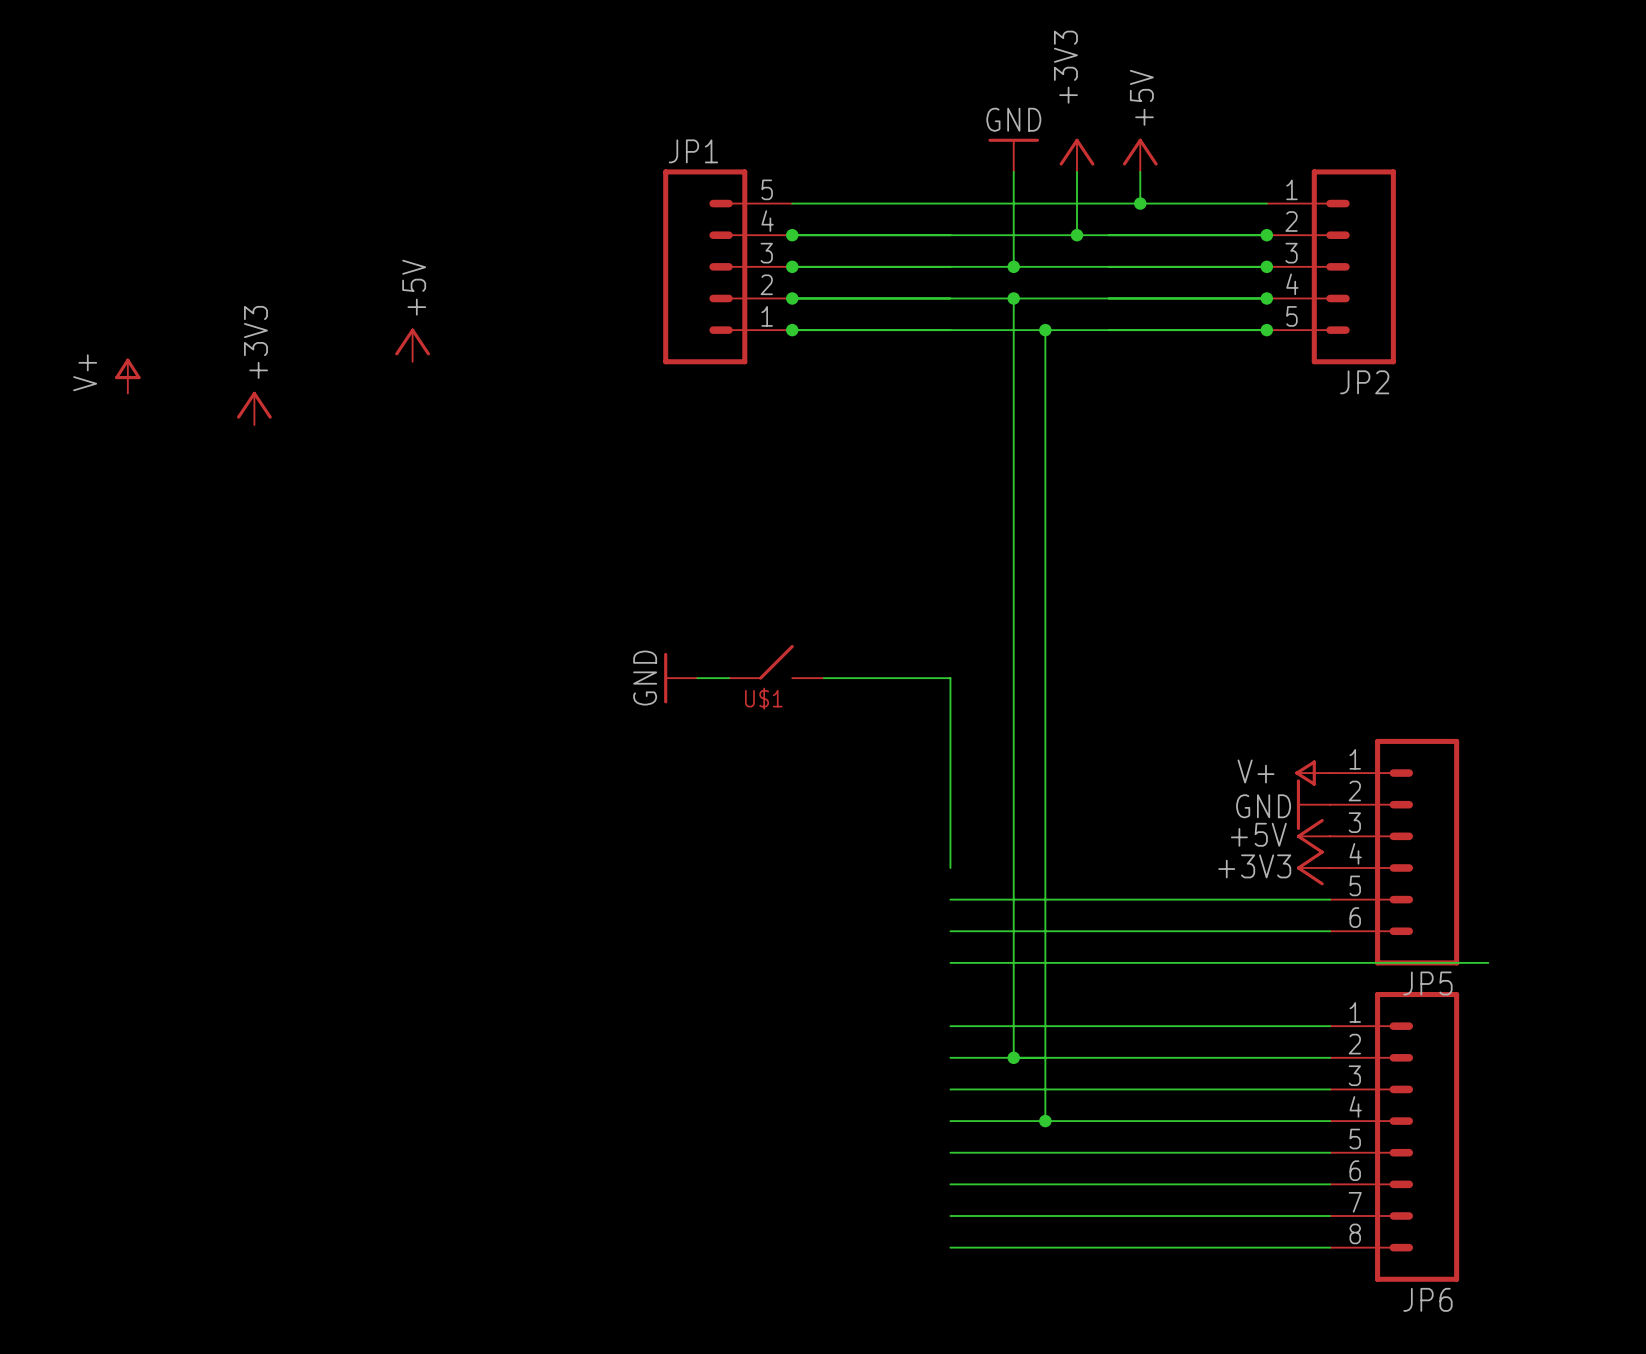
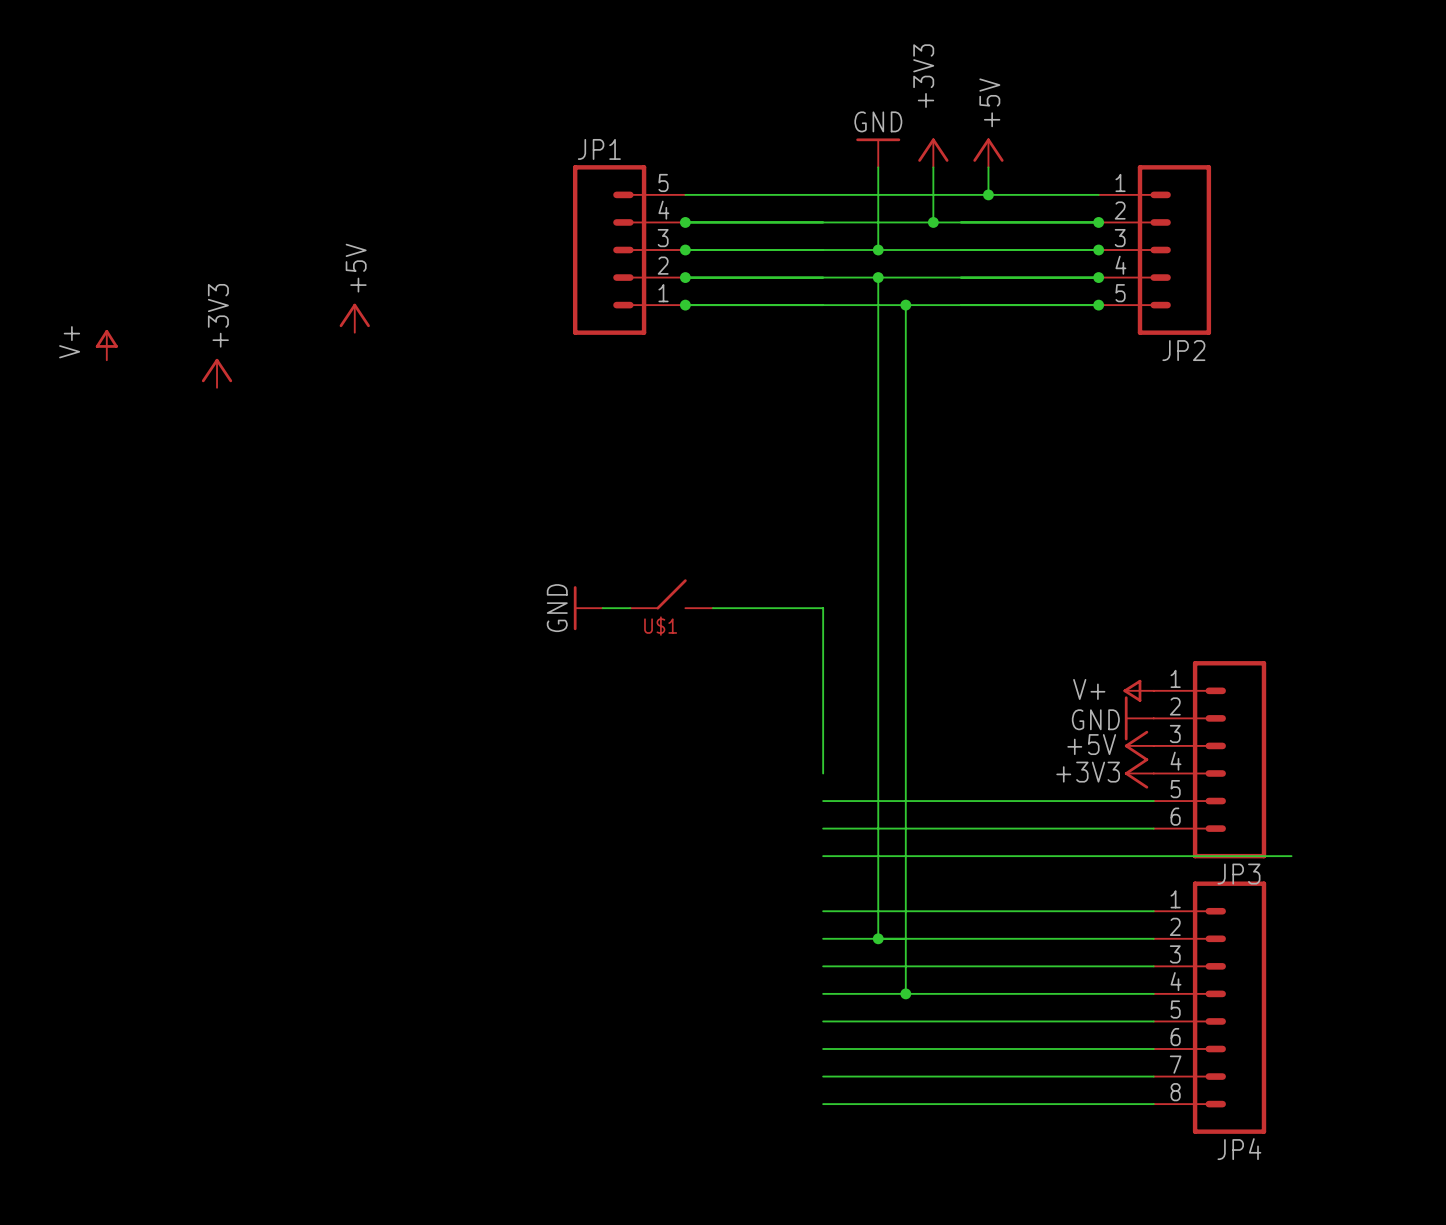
JP5 name: JP5 (1427, 983) -> JP3 (1238, 874)
JP6 name: JP6 (1427, 1299) -> JP4 (1239, 1149)

